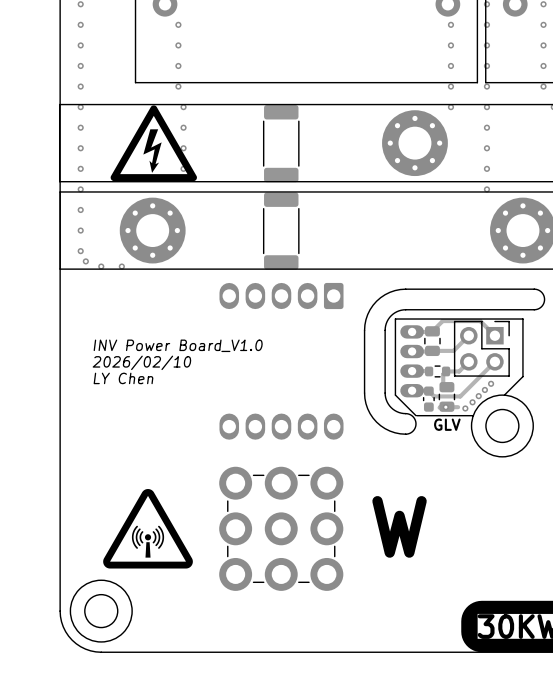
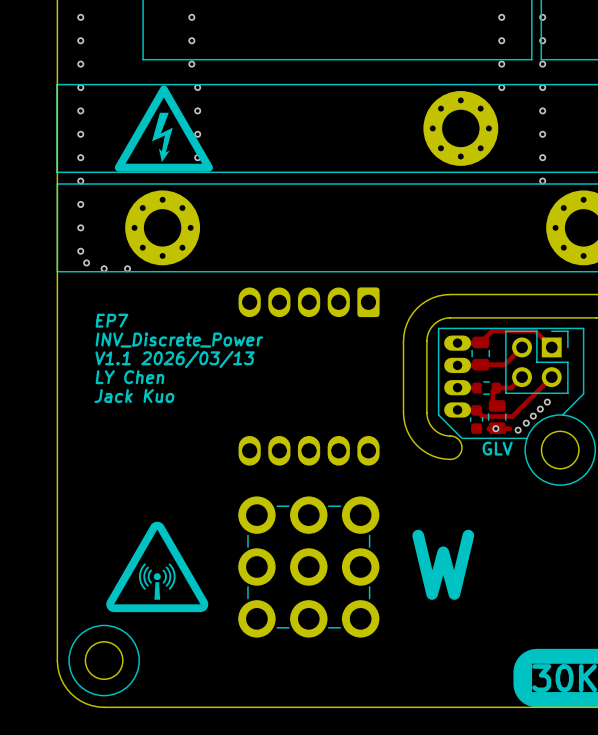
part: (281, 143) -> none
part: (281, 231) -> none
text: none -> EP7 (111, 320)
text: none -> INV_Discrete_Power (179, 340)
text: INV Power Board_V1.0 (178, 345) -> V1.1 2026/03/13 (175, 359)
text: 2026/02/10 (141, 362) -> LY Chen (130, 377)
text: LY Chen (123, 378) -> Jack Kuo (134, 395)

